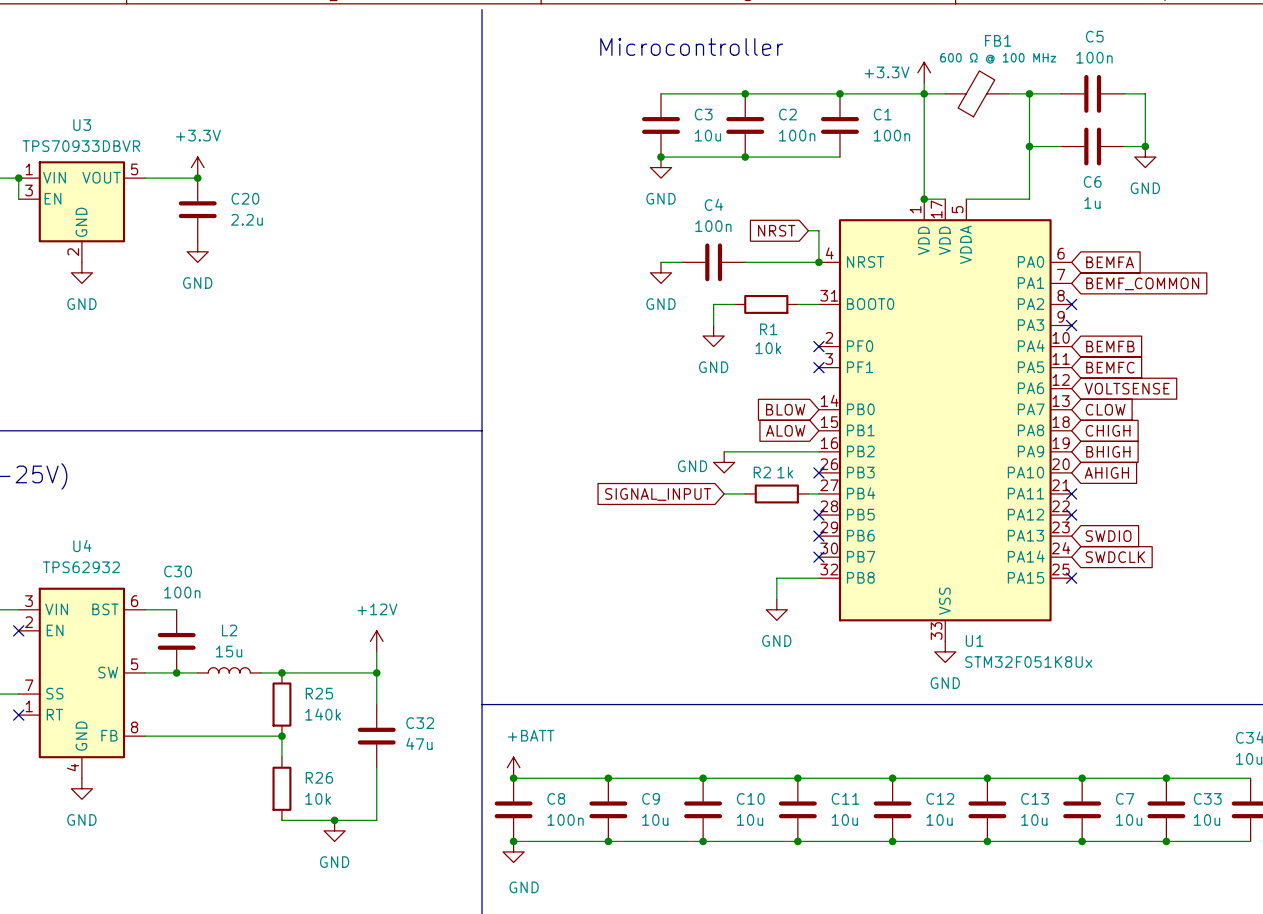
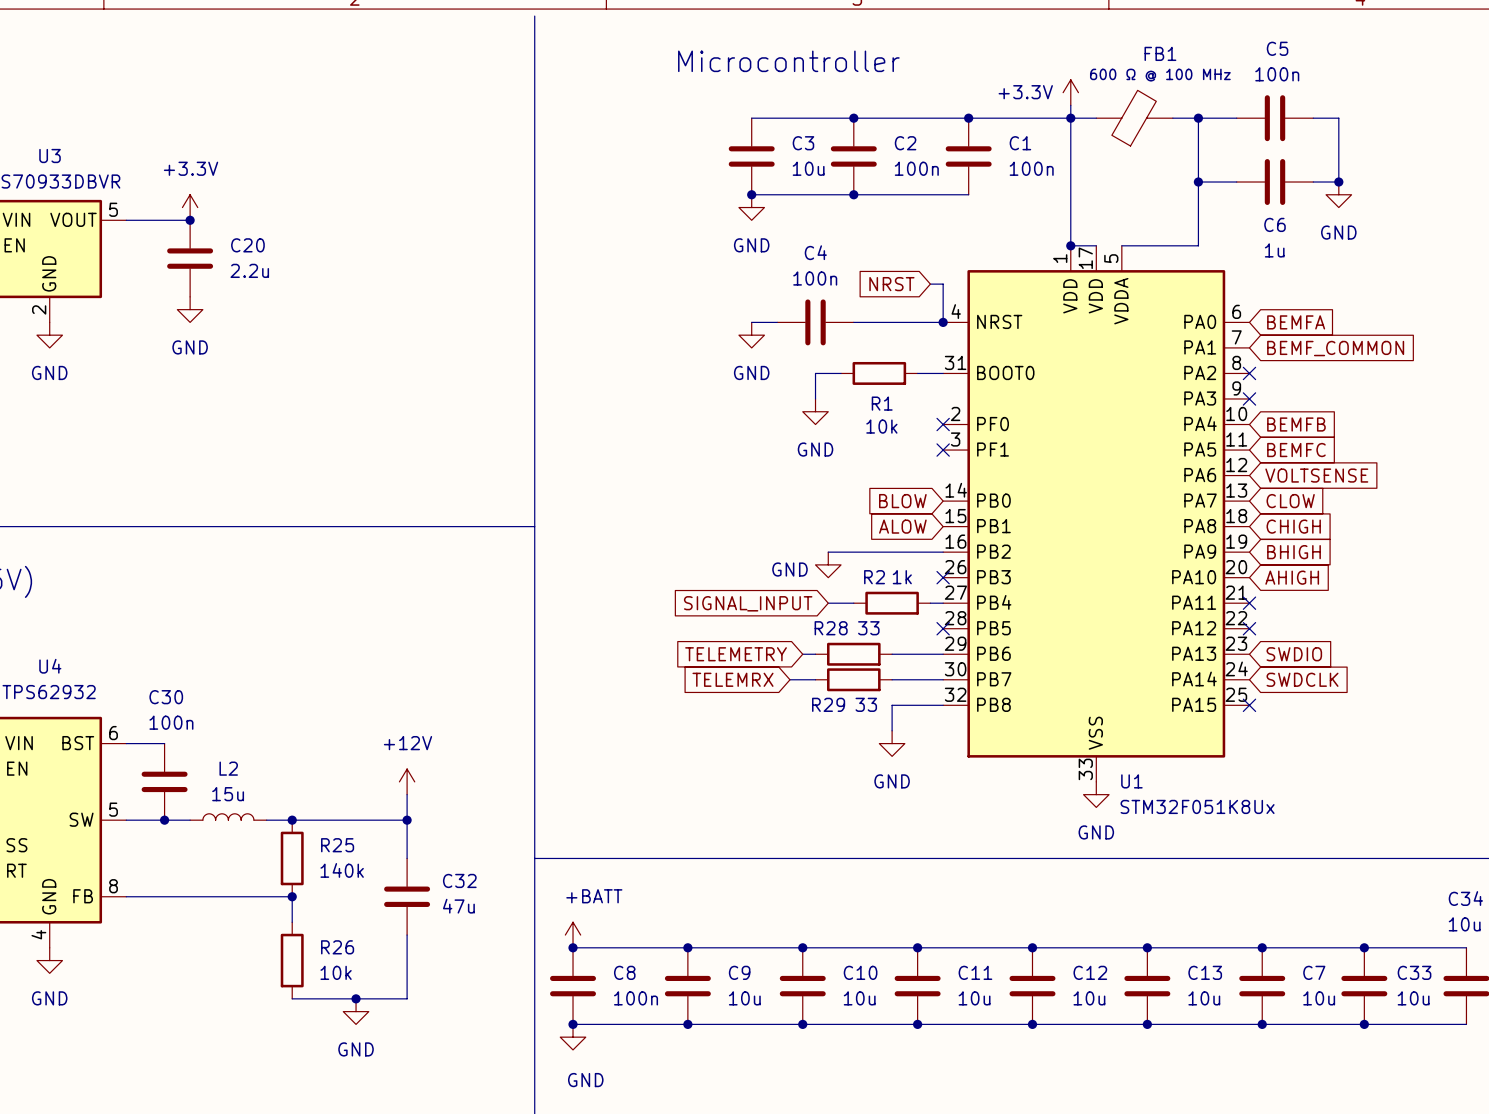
global label: none -> TELEMETRY (736, 654)
wire: none -> (802, 654) (815, 654)
R28: none -> 33 (853, 654)
wire: none -> (892, 654) (943, 654)
no-connect mark: (818, 536) -> none
global label: none -> TELEMRX (732, 679)
wire: none -> (789, 679) (815, 679)
R29: none -> 33 (853, 679)
wire: none -> (892, 679) (943, 679)
no-connect mark: (818, 557) -> none

